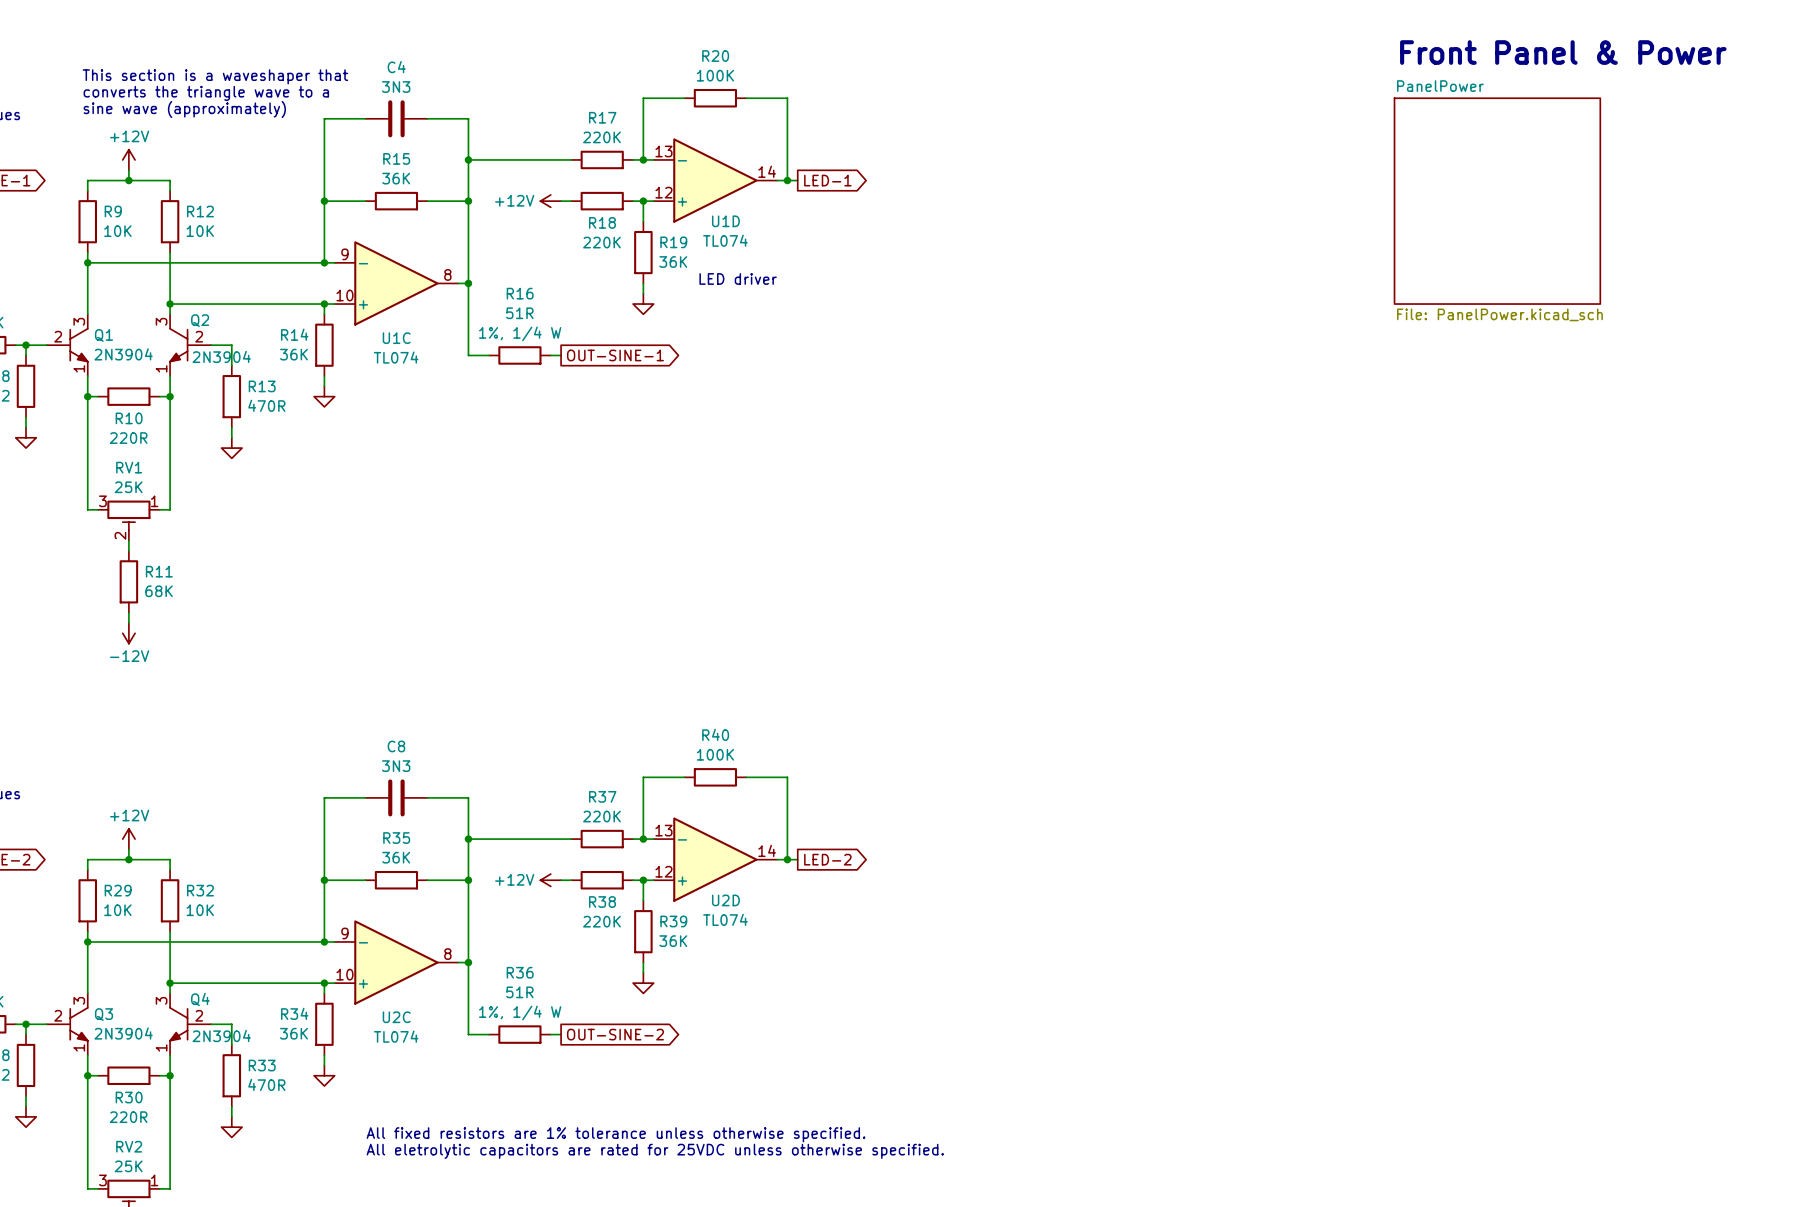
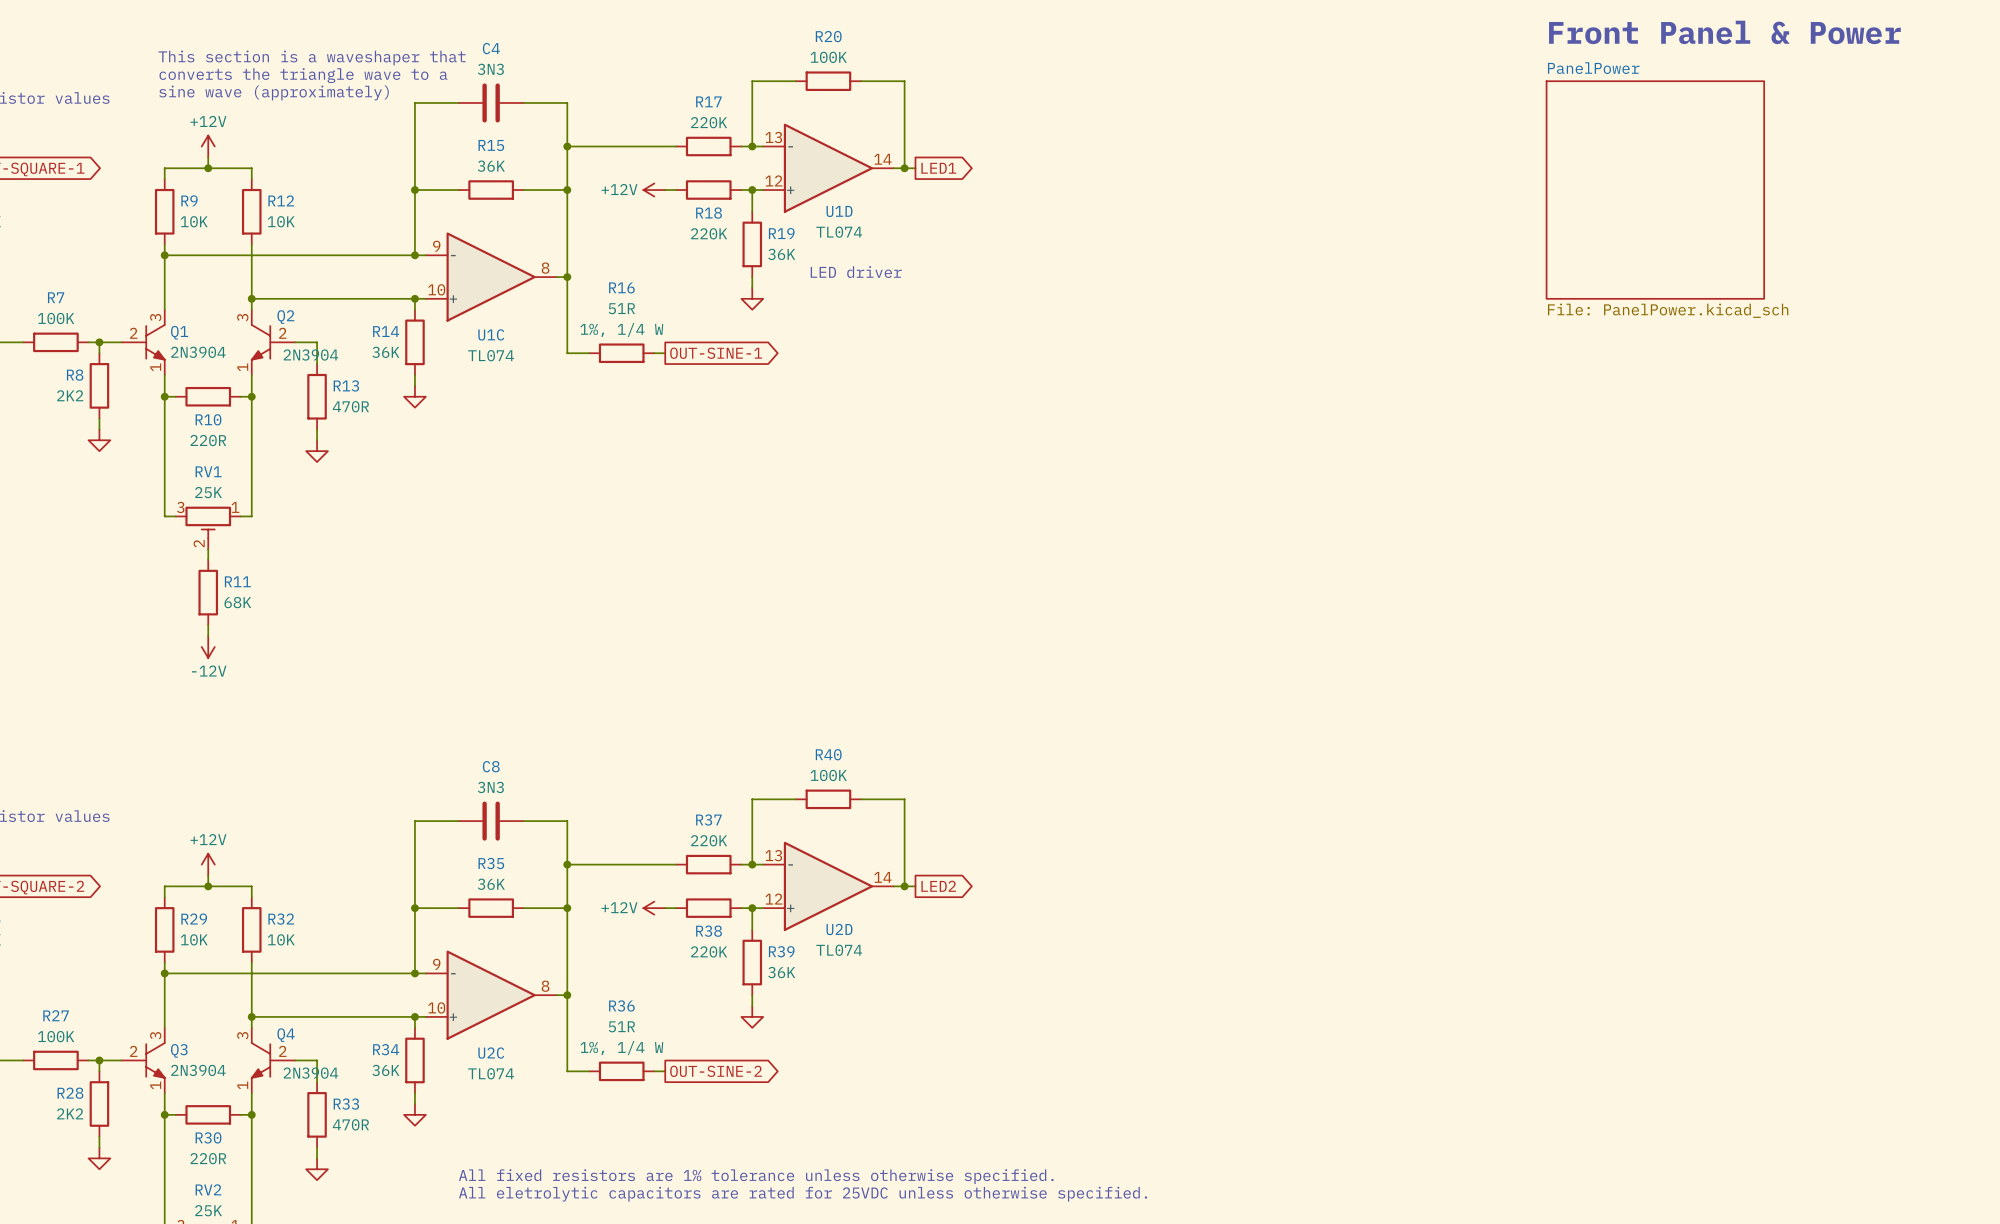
global label: LED-1 (827, 180) -> LED1 (938, 168)
global label: LED-2 (827, 859) -> LED2 (938, 886)

